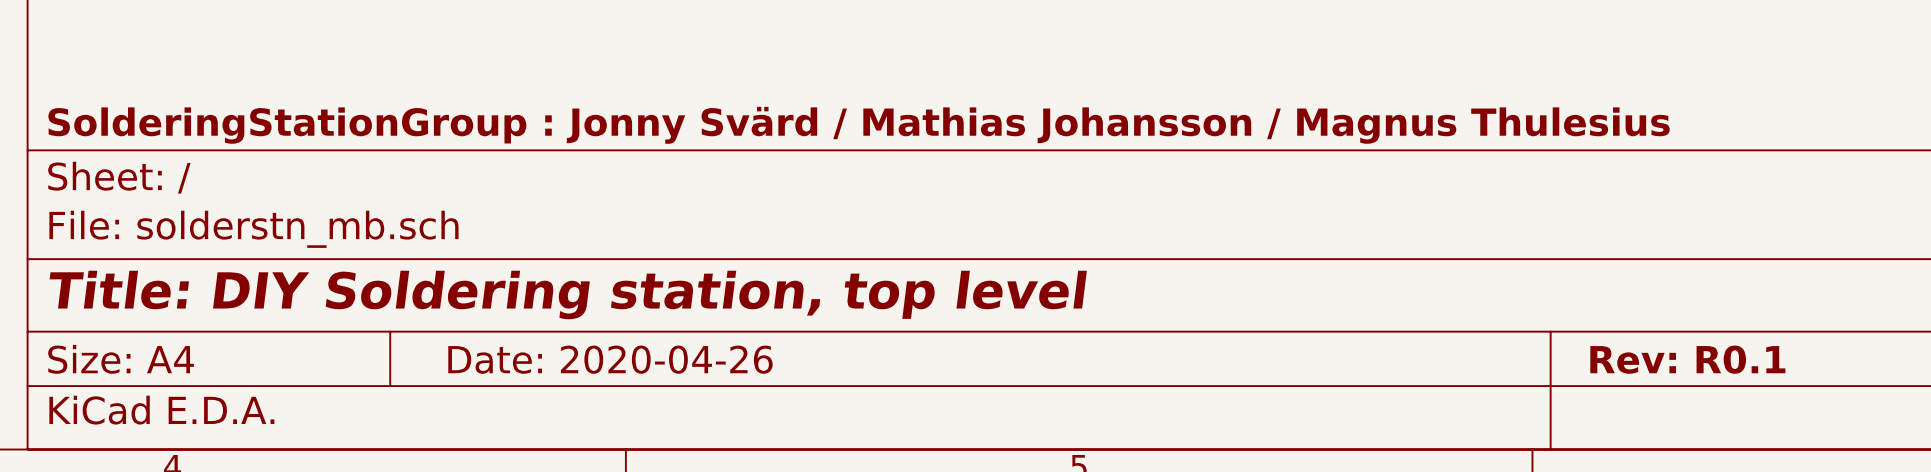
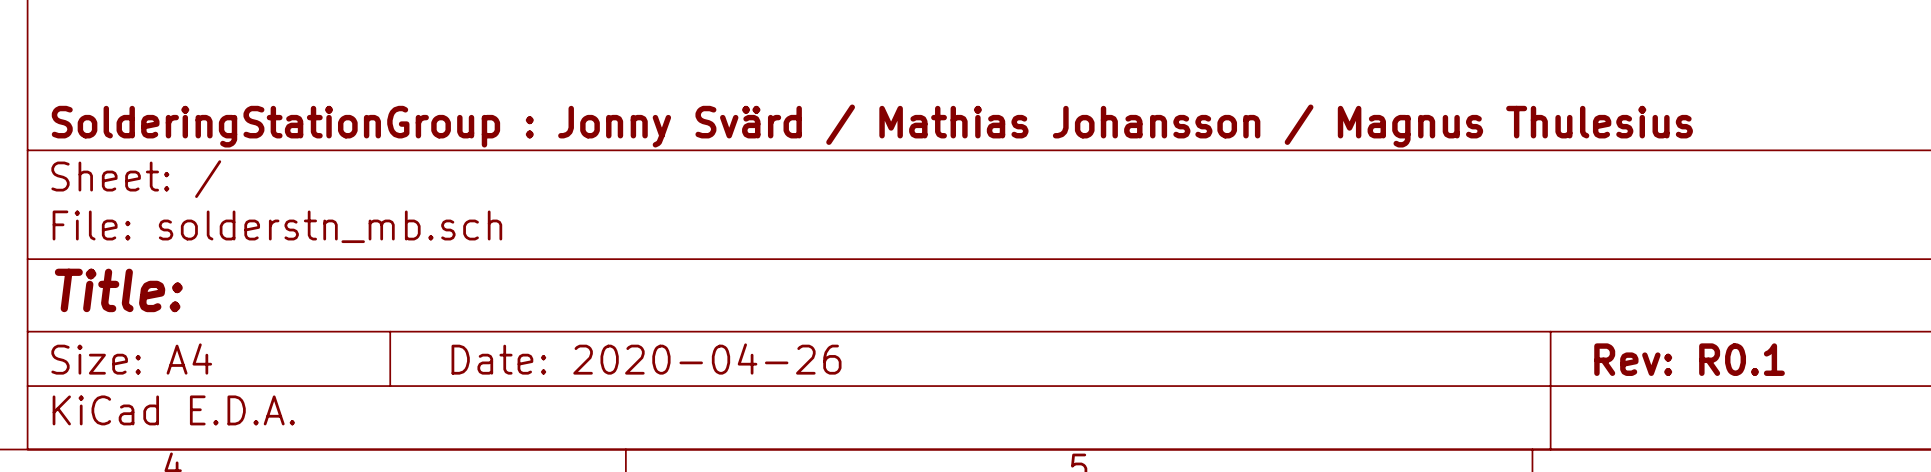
title block: Title: DIY Soldering station, top level (568, 295) -> Title: (118, 290)

